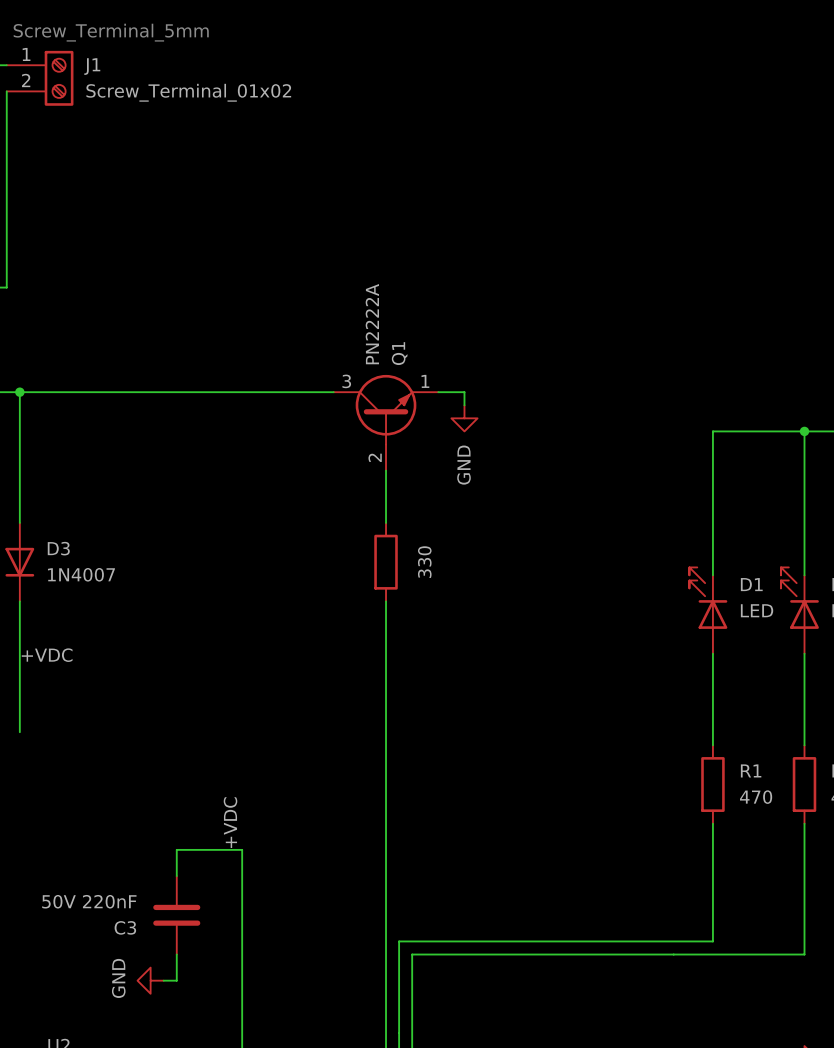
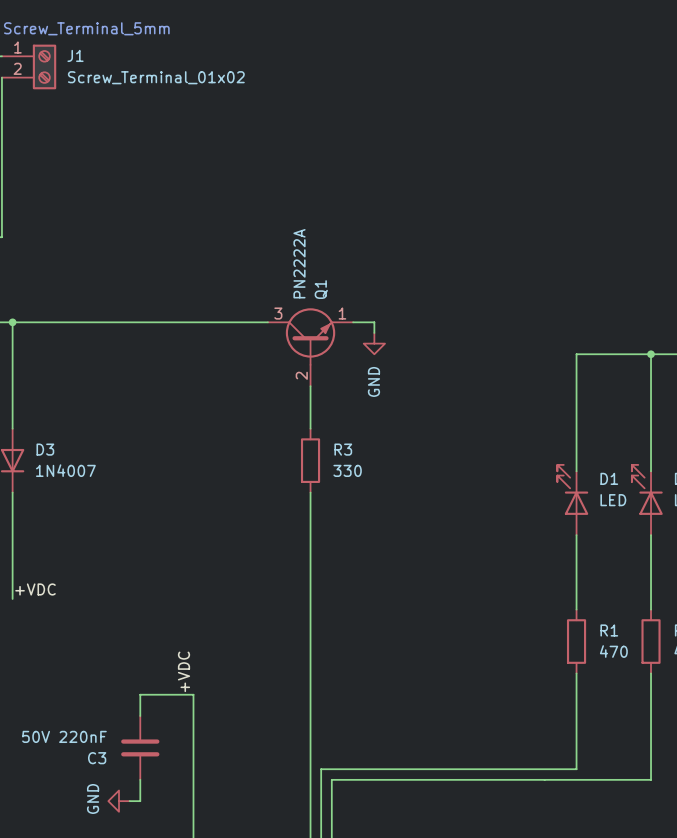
R3 name: none -> R3 (343, 449)
R3 value rotation: 0° (424, 562) -> 90° clockwise (347, 470)
label position: +VDC (47, 655) -> +VDC (35, 589)

